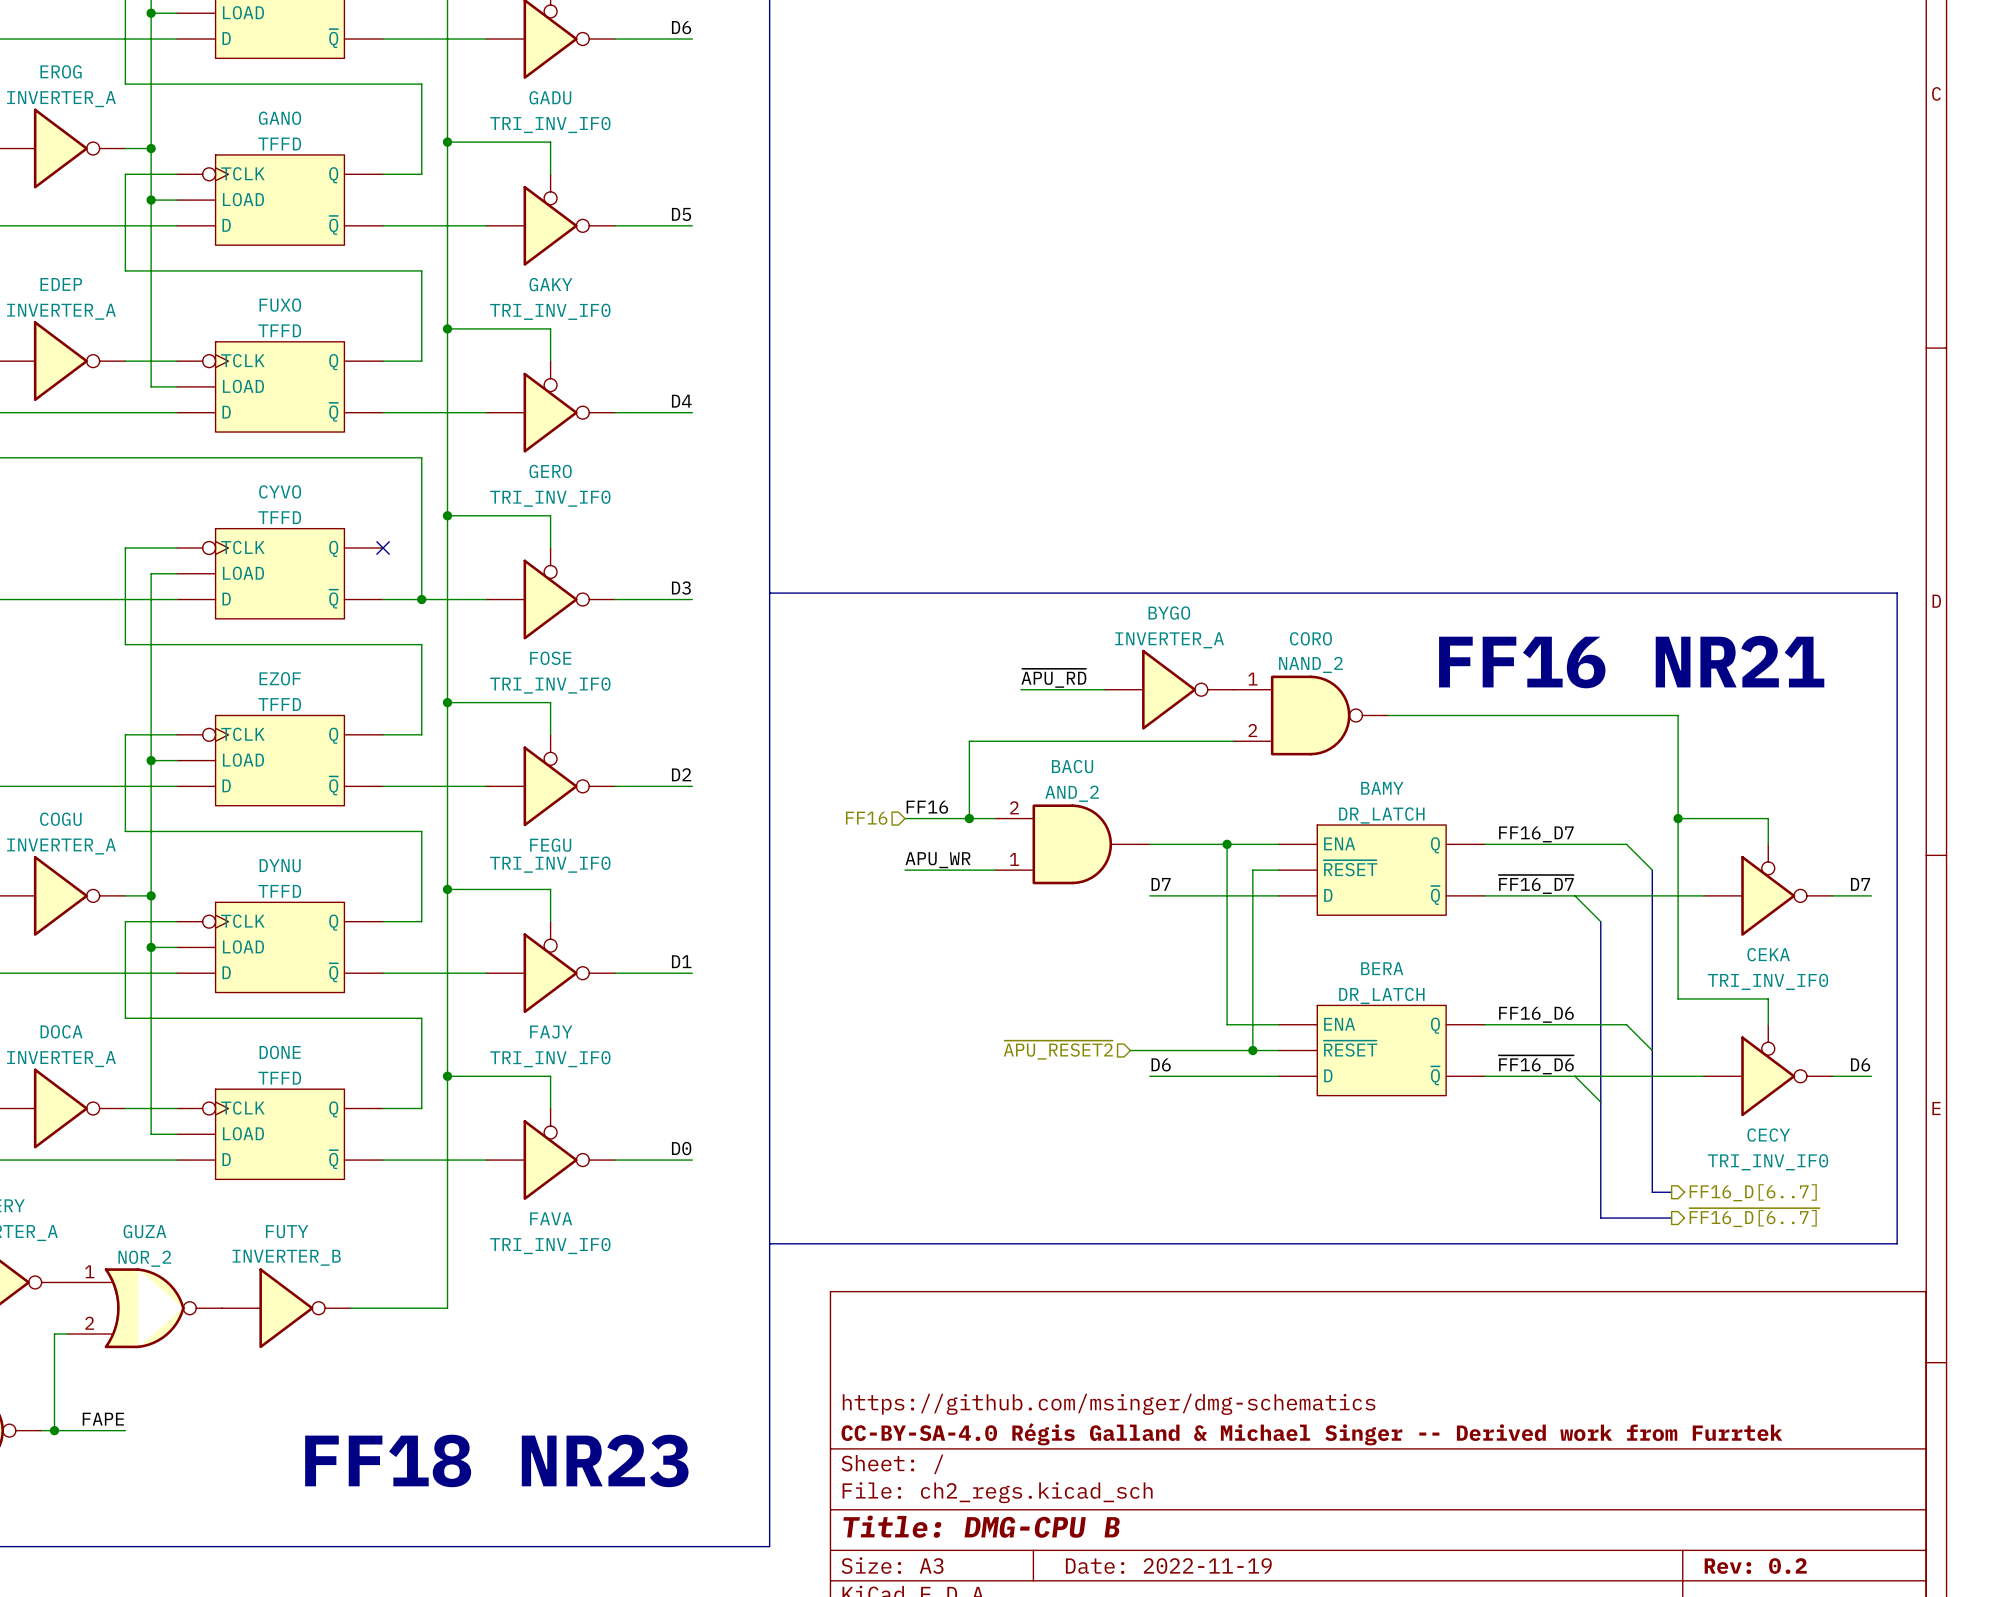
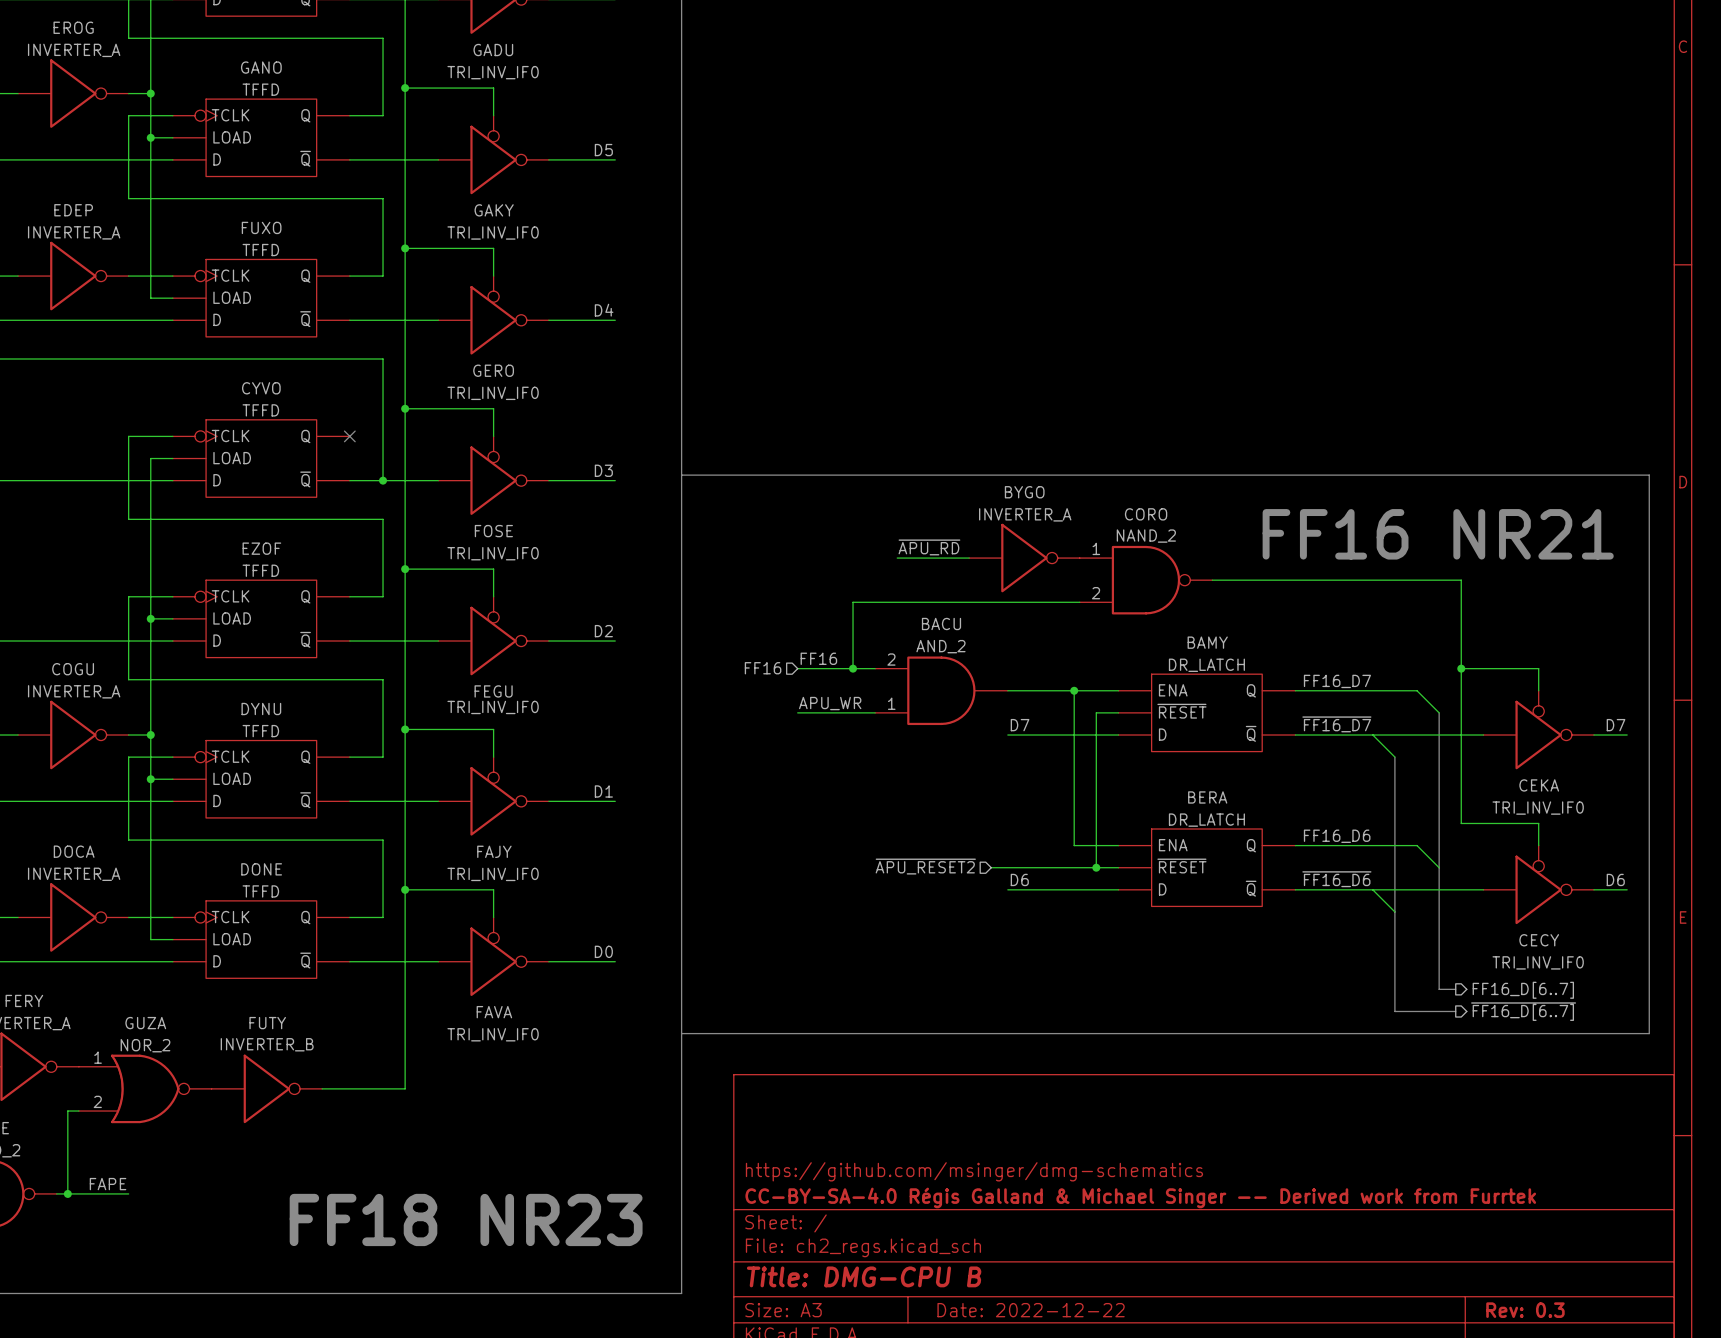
title block: Date: 2022-11-19 (1168, 1566) -> Date: 2022-12-22 (1031, 1310)
title block: Rev: 0.2 (1755, 1566) -> Rev: 0.3 (1525, 1310)

